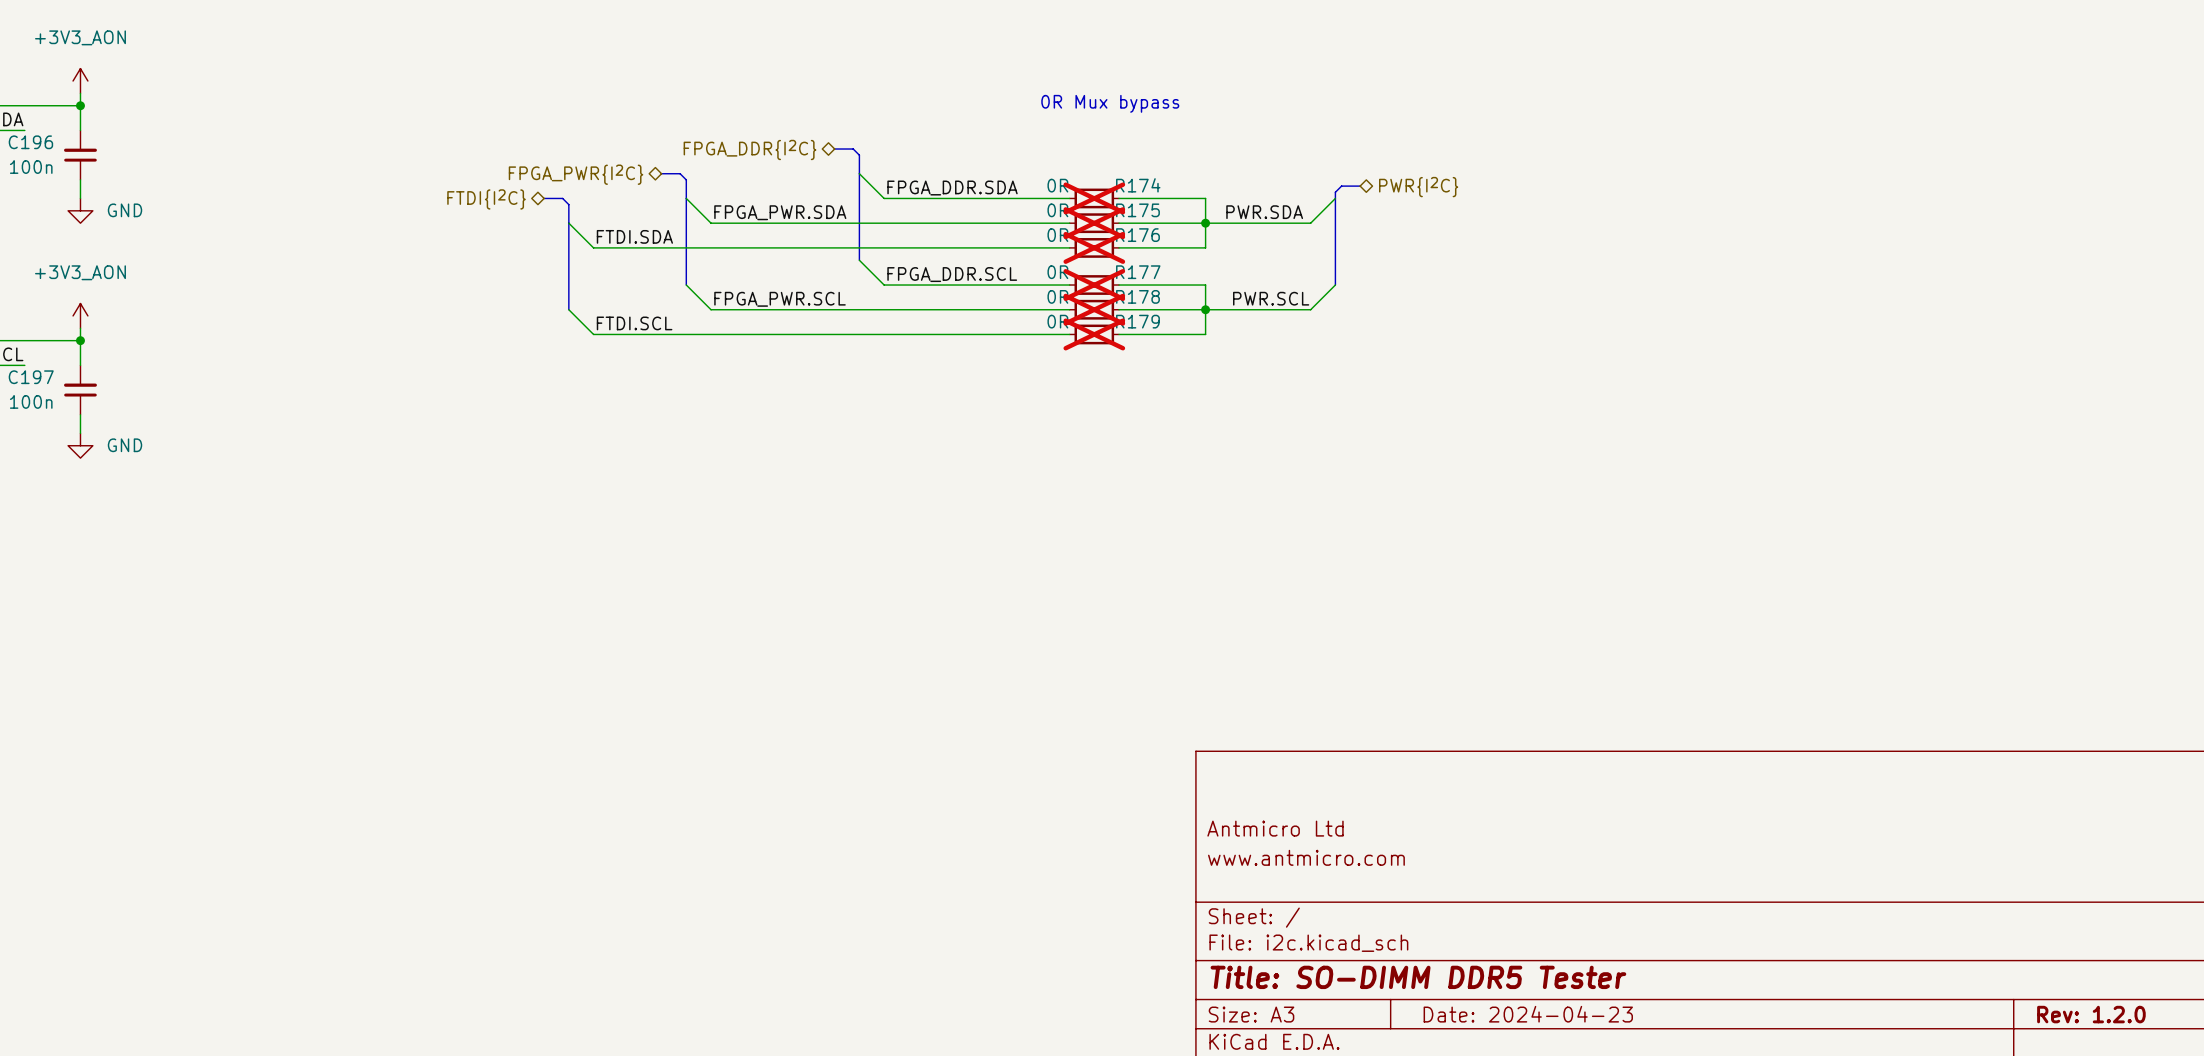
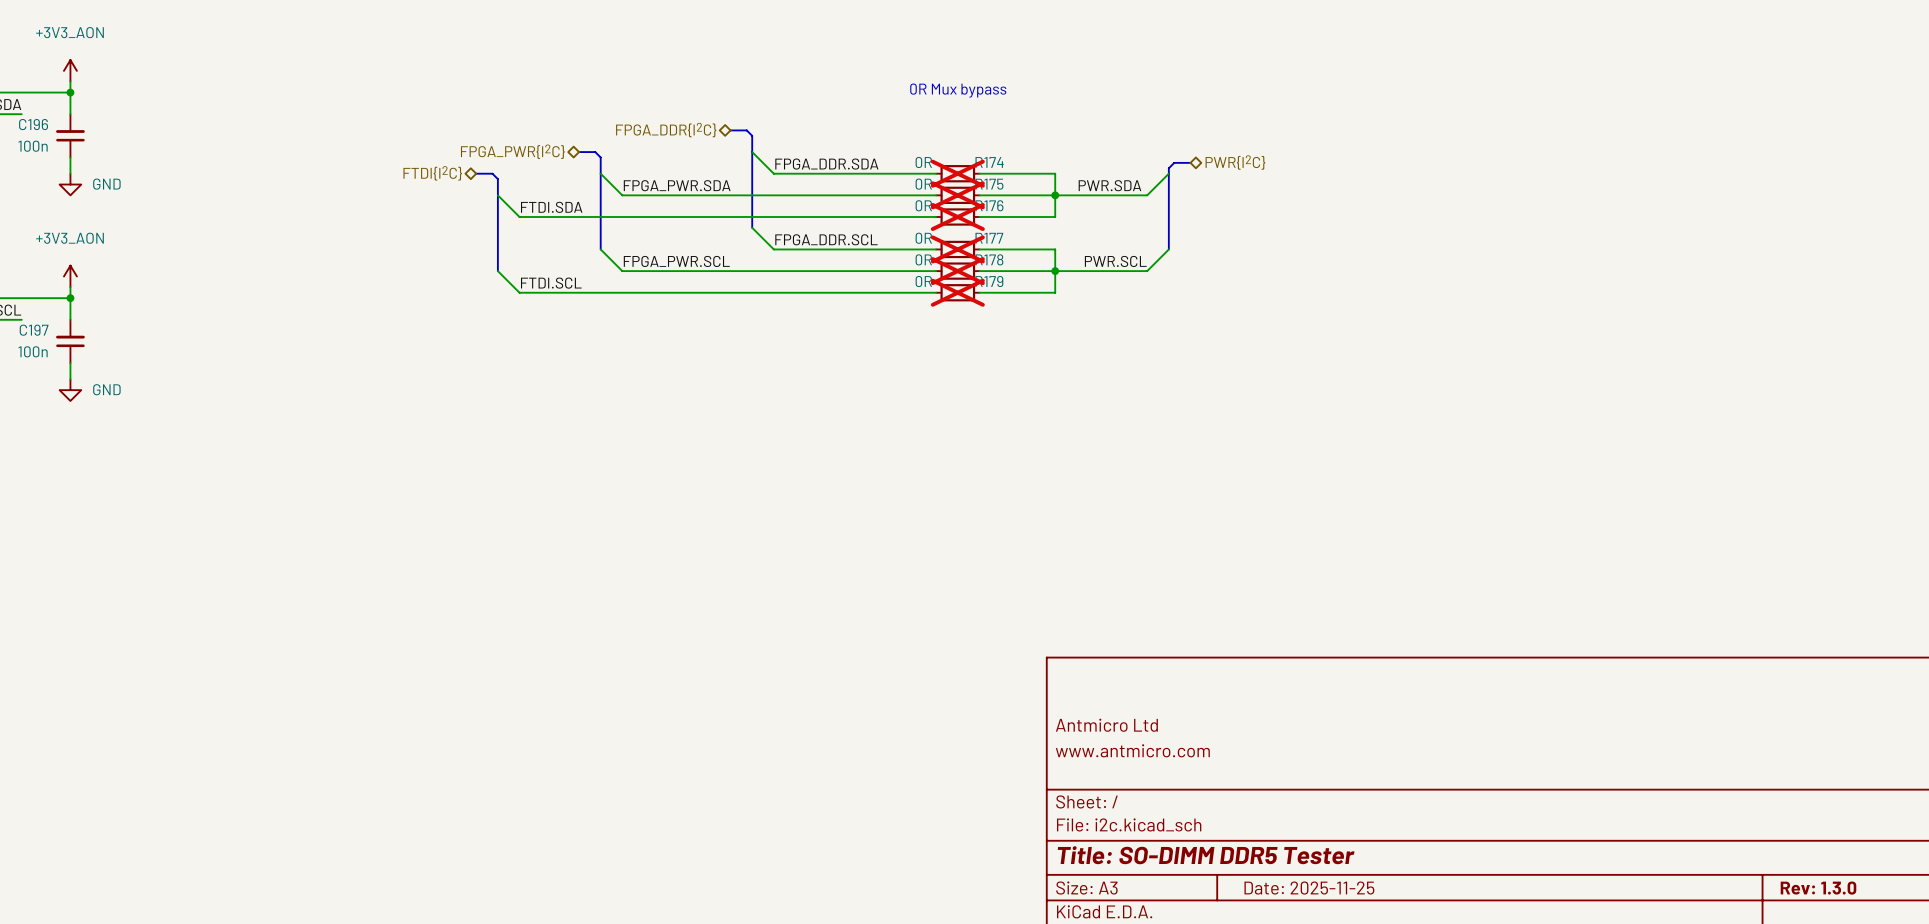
title block: Date: 2024-04-23 (1528, 1014) -> Date: 2025-11-25 (1309, 888)
title block: Rev: 1.2.0 (2091, 1014) -> Rev: 1.3.0 (1818, 888)

